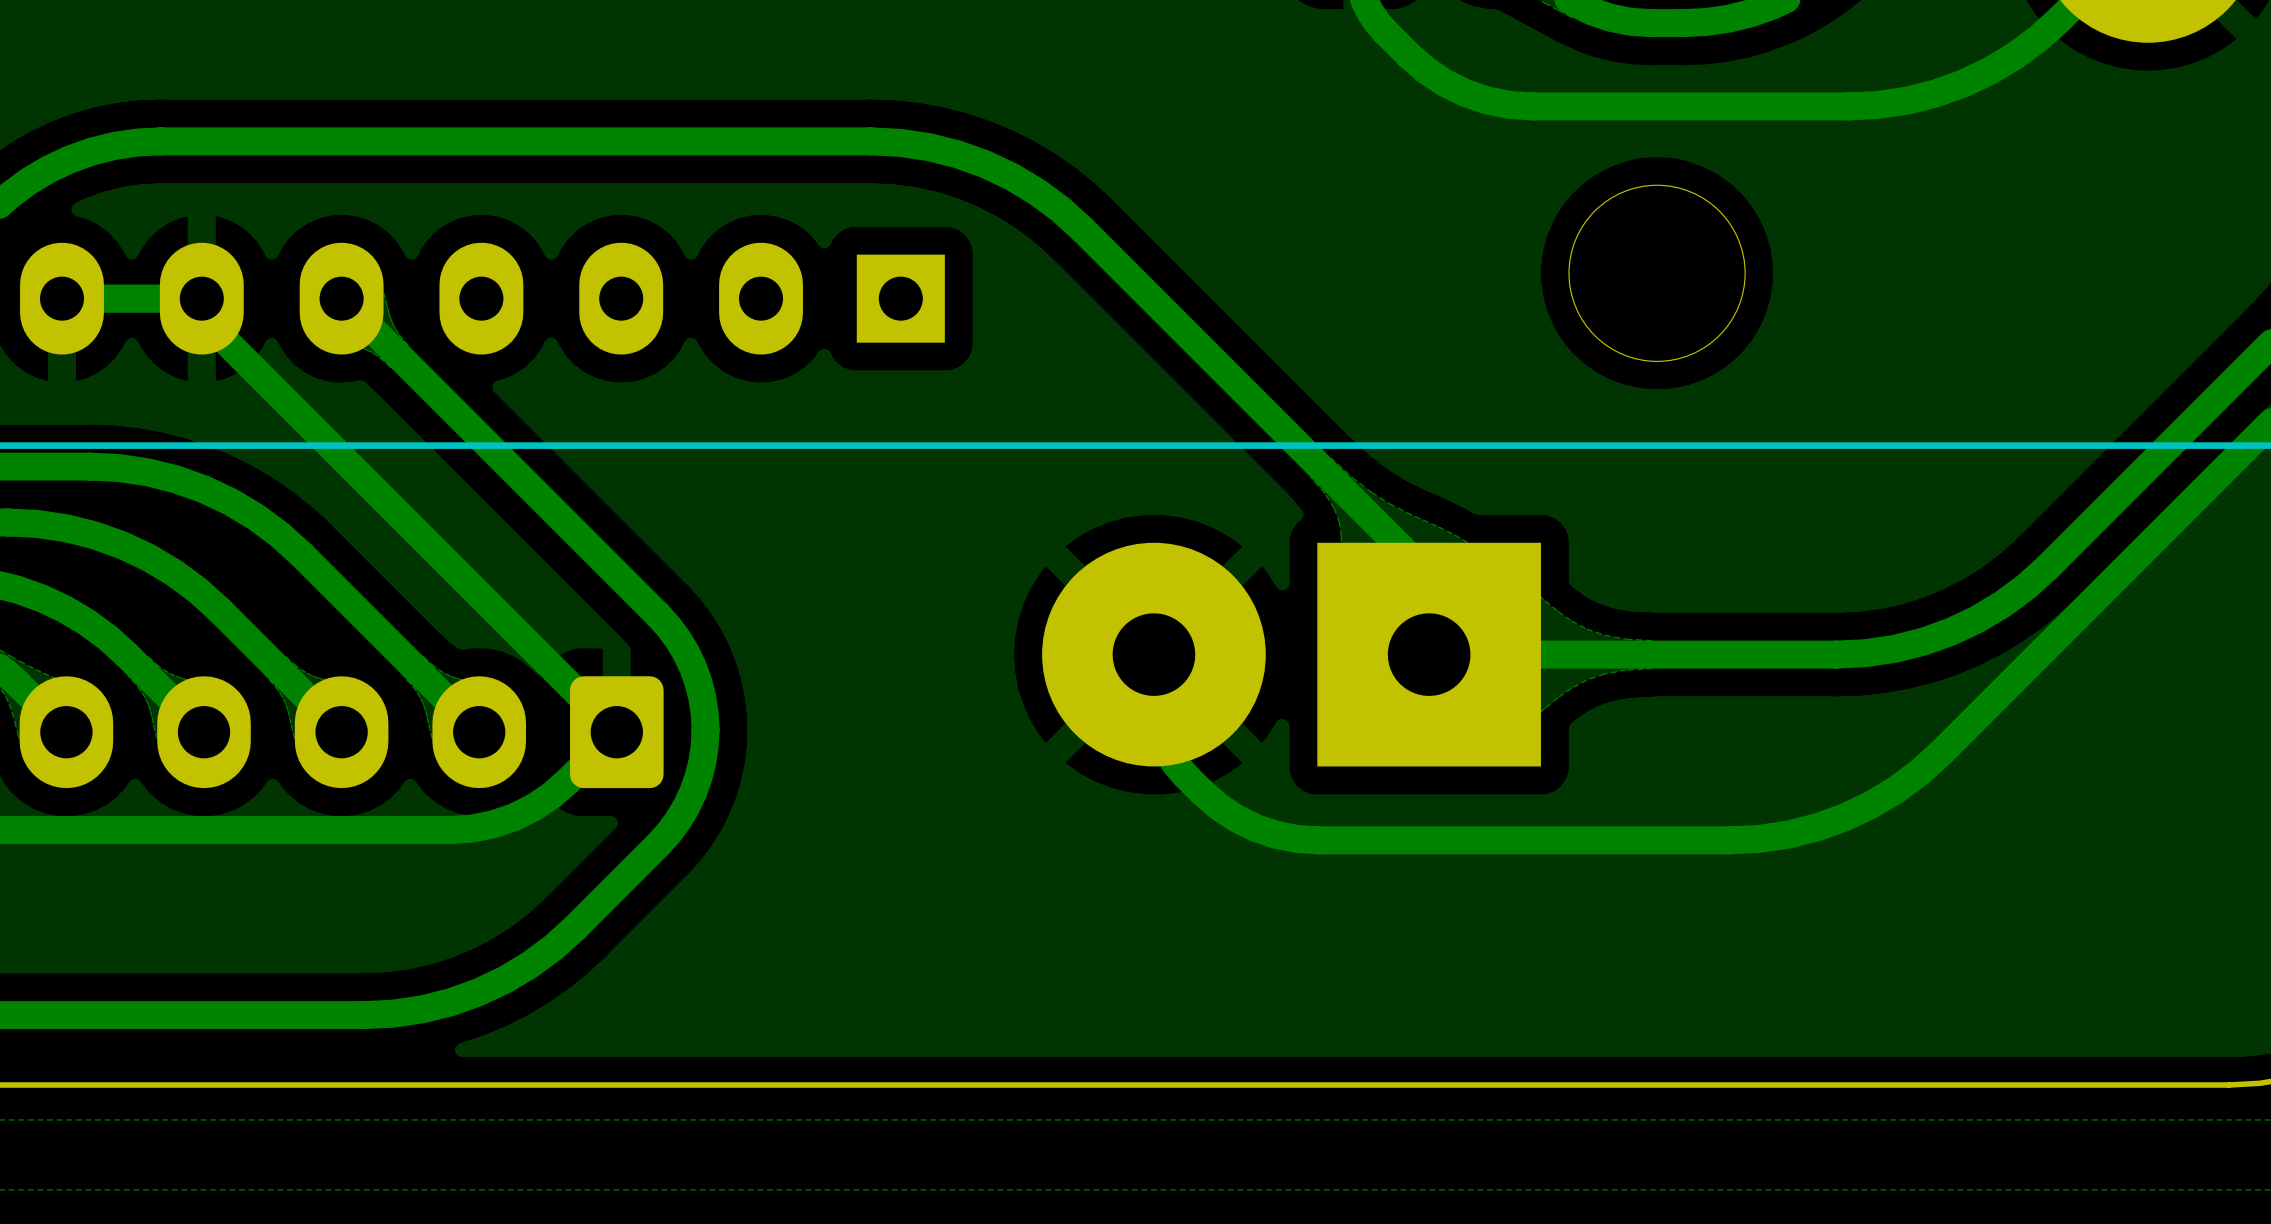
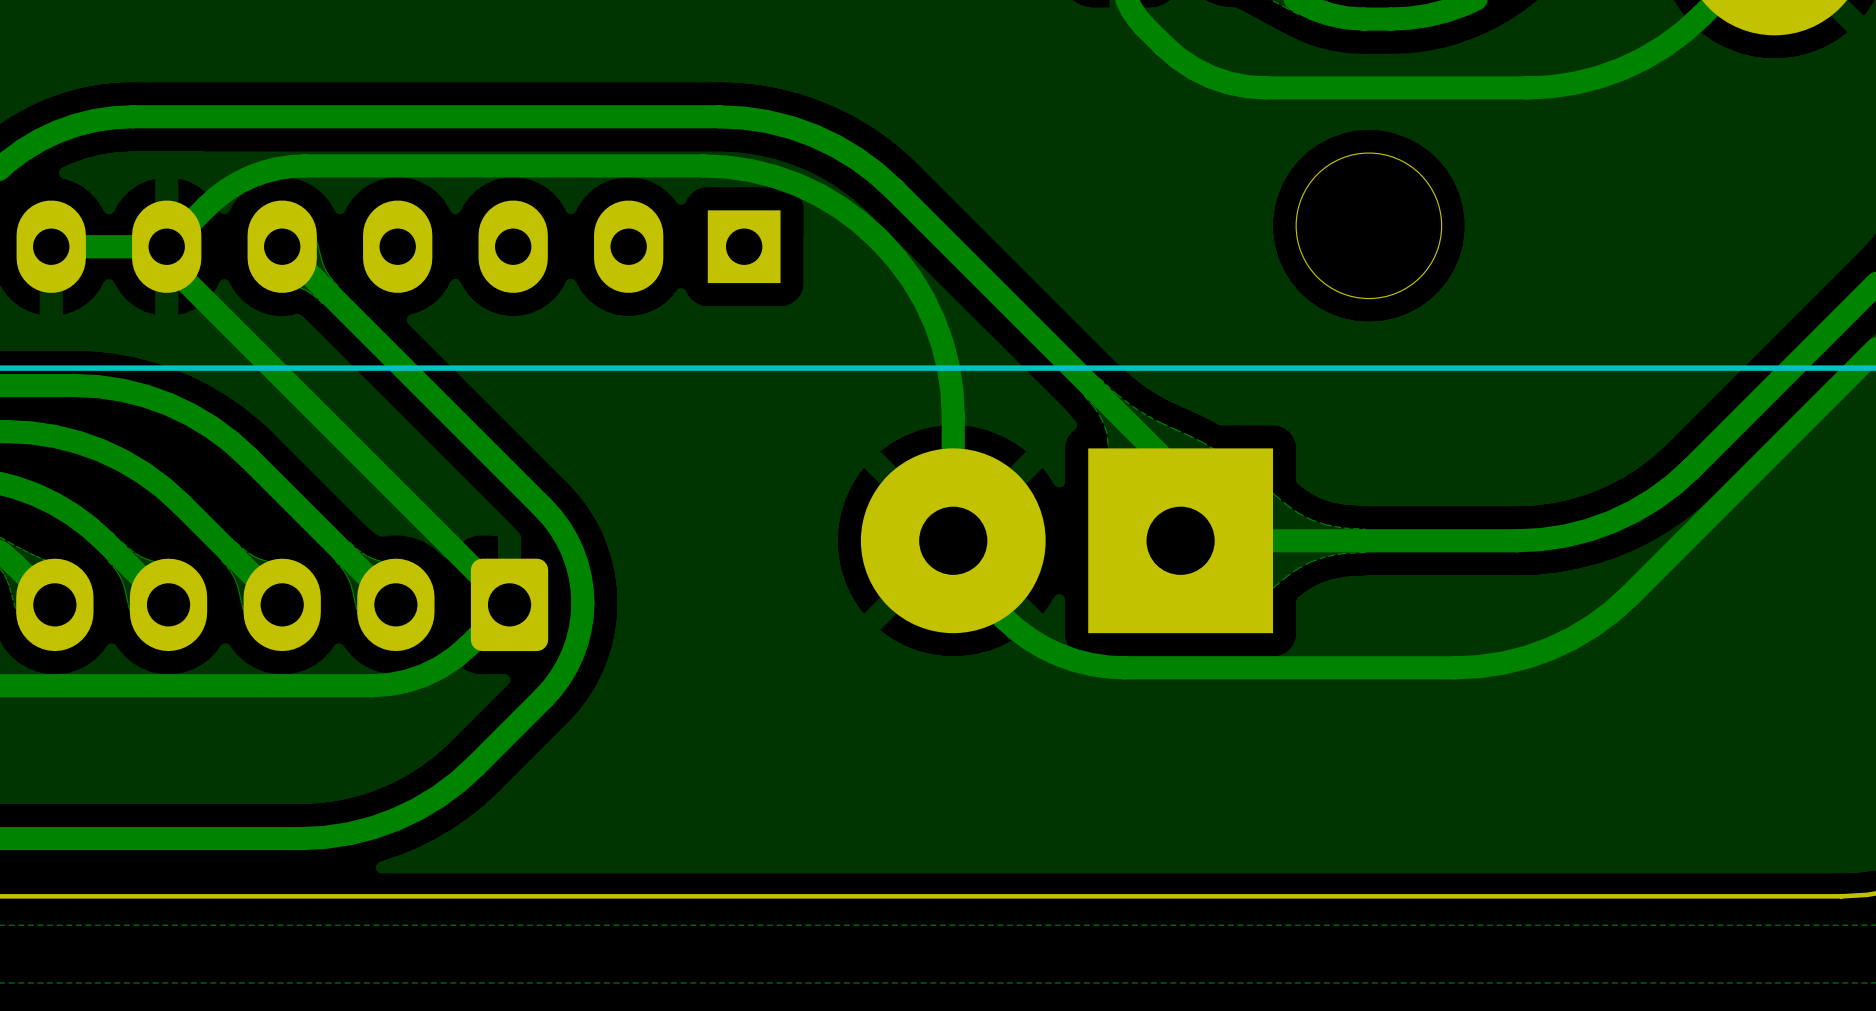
bottom track: none -> (172, 241) (207, 206) (228, 189) (264, 171) (291, 166) (702, 165) (751, 170) (797, 184) (840, 207) (877, 238) (911, 278) (934, 321) (948, 367) (952, 392) (953, 540)
bottom track: (1153, 670) (1153, 699) (1157, 727) (1168, 753) (1185, 775) (1218, 806) (1255, 827) (1275, 834) (1318, 840) (1729, 840) (1788, 834) (1844, 817) (1895, 789) (1919, 772) (1973, 720) -> (953, 554) (955, 566) (962, 576) (1003, 617) (1029, 638) (1058, 654) (1074, 660) (1107, 666) (1479, 666) (1503, 663) (1549, 648) (1592, 626) (1630, 595)

